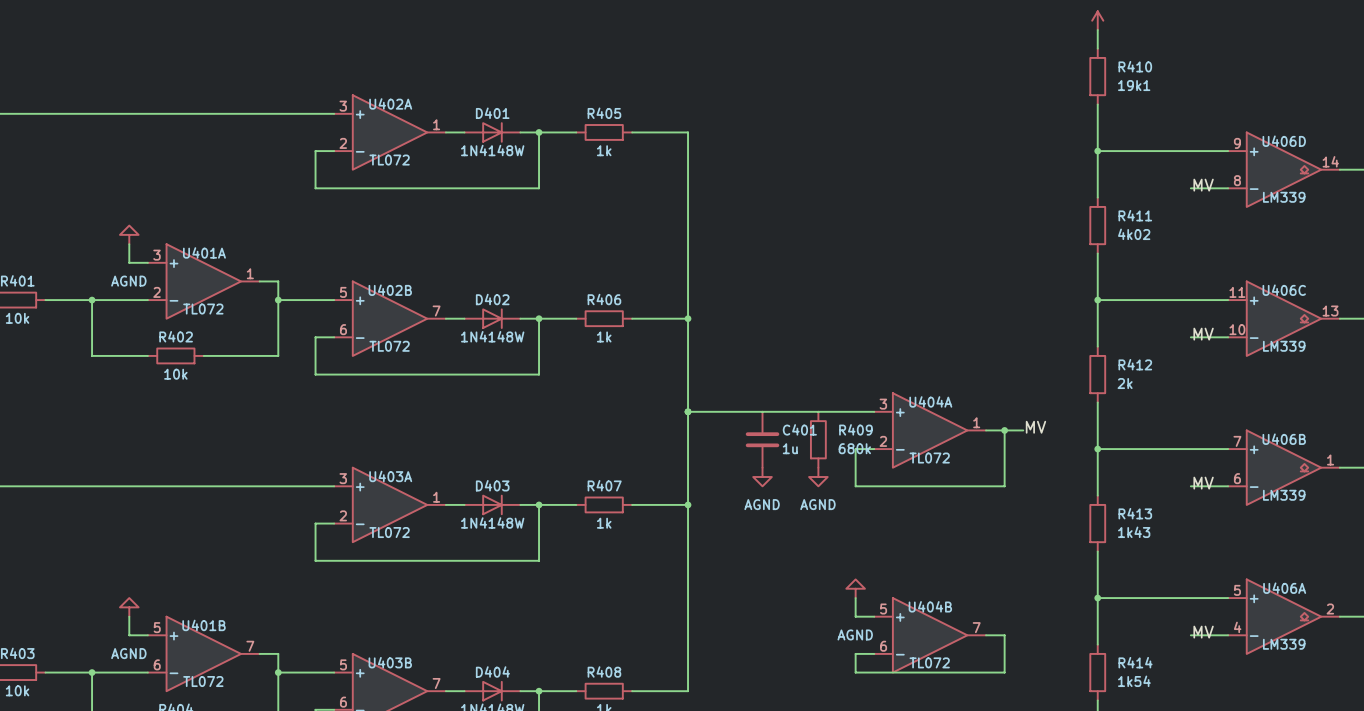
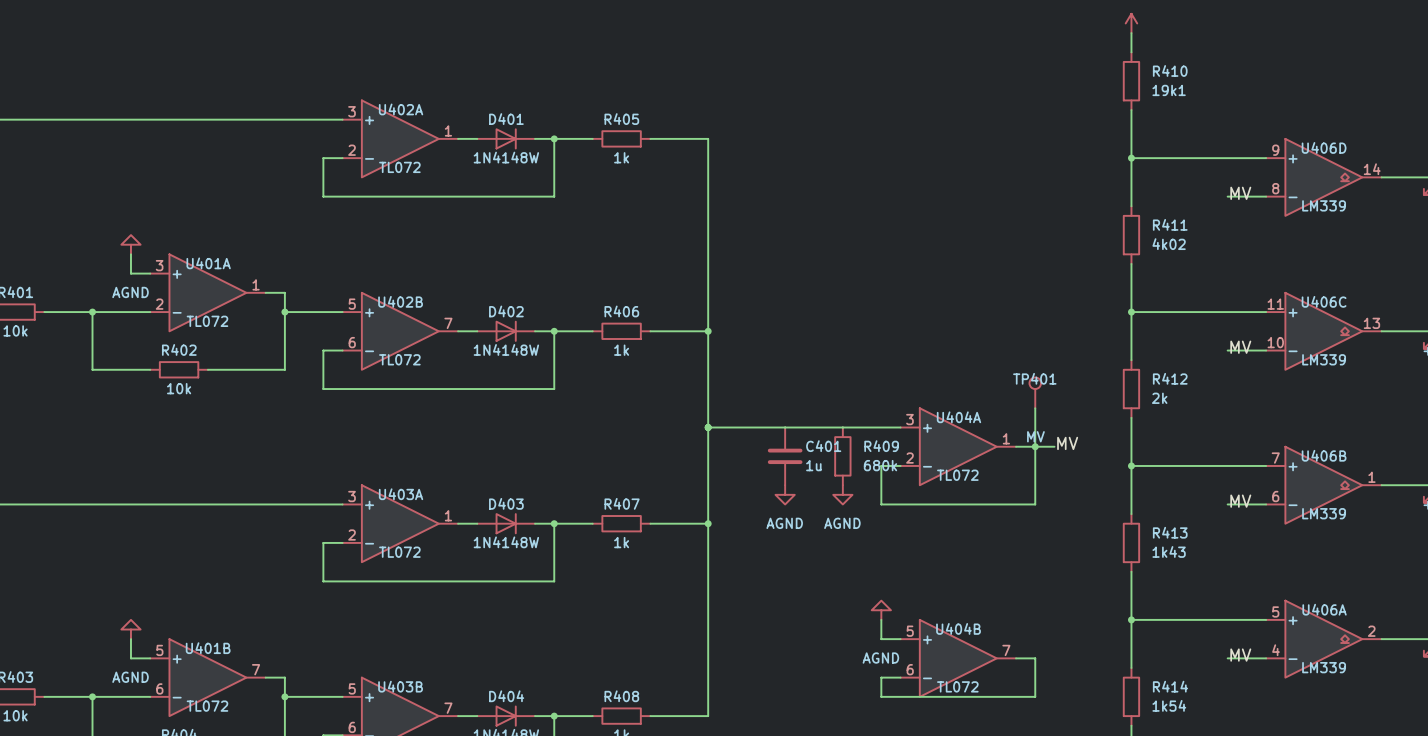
TP401: none -> MV (1035, 392)
wire: none -> (1035, 408) (1035, 446)

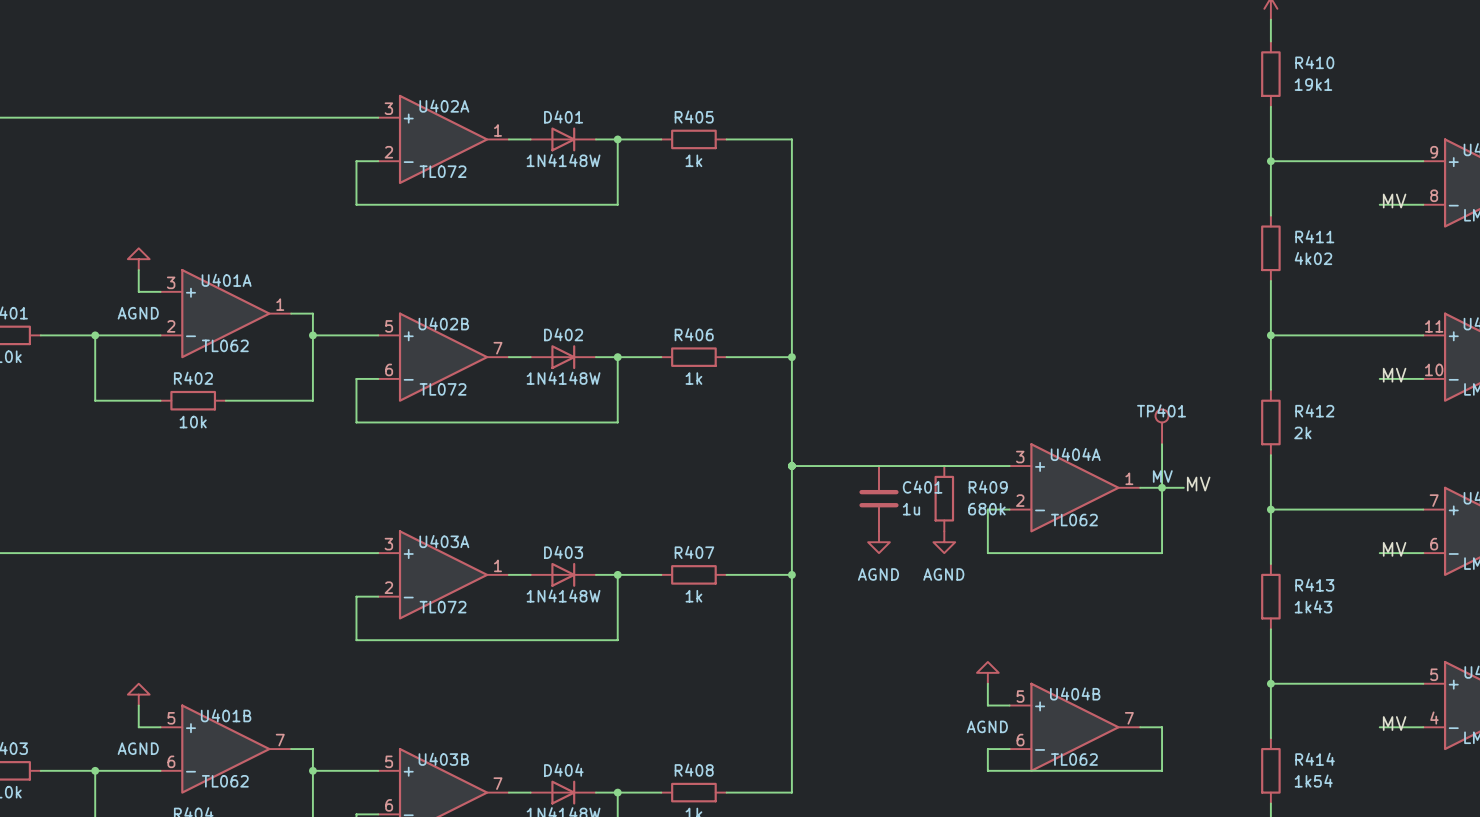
U401A value: TL072 (207, 321) -> TL062 (225, 345)
U404A value: TL072 (957, 475) -> TL062 (1074, 520)
U404B value: TL072 (957, 686) -> TL062 (1074, 759)
U401B value: TL072 (207, 706) -> TL062 (225, 781)

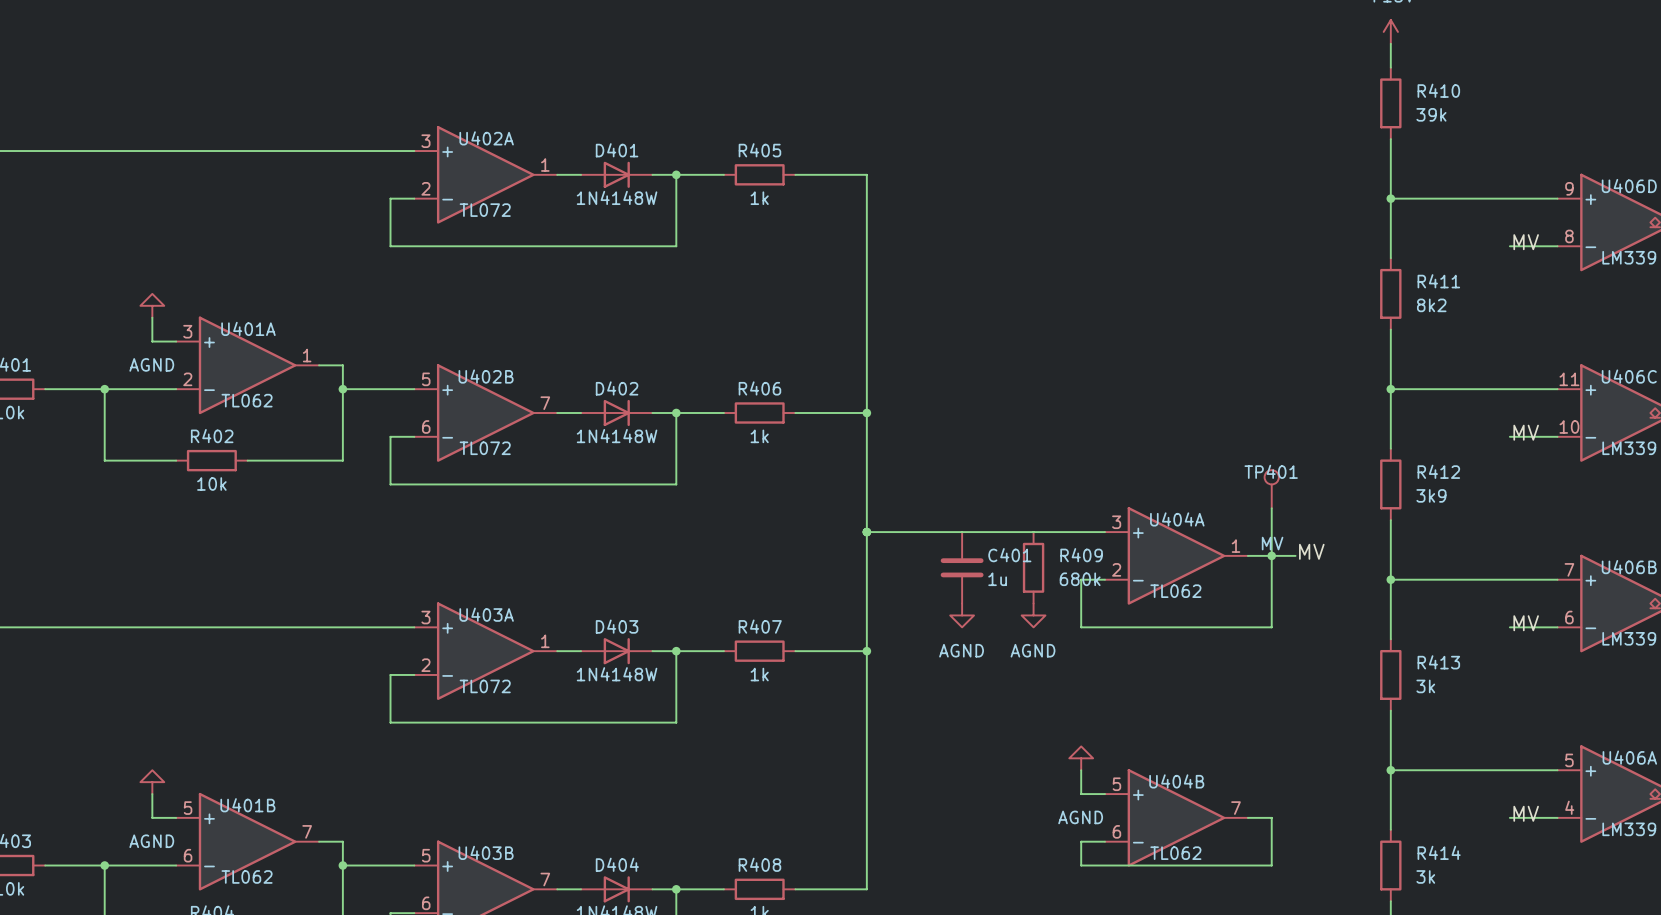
R410 value: 19k1 (1313, 84) -> 39k (1431, 114)
R411 value: 4k02 (1313, 258) -> 8k2 (1431, 305)
R412 value: 2k (1302, 432) -> 3k9 (1431, 495)
R413 value: 1k43 (1313, 606) -> 3k (1425, 686)
R414 value: 1k54 (1313, 781) -> 3k (1425, 876)

